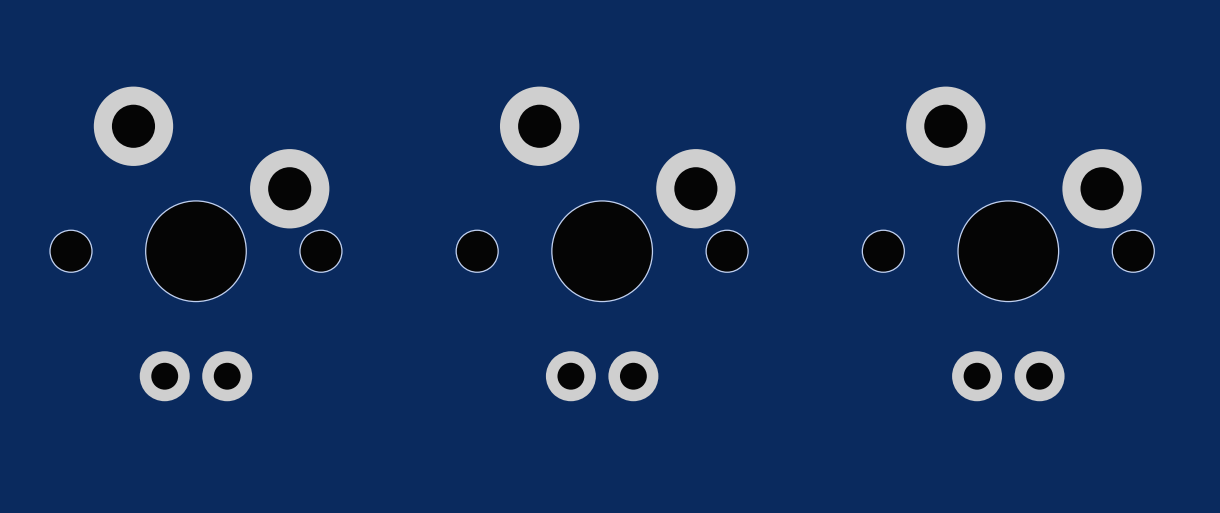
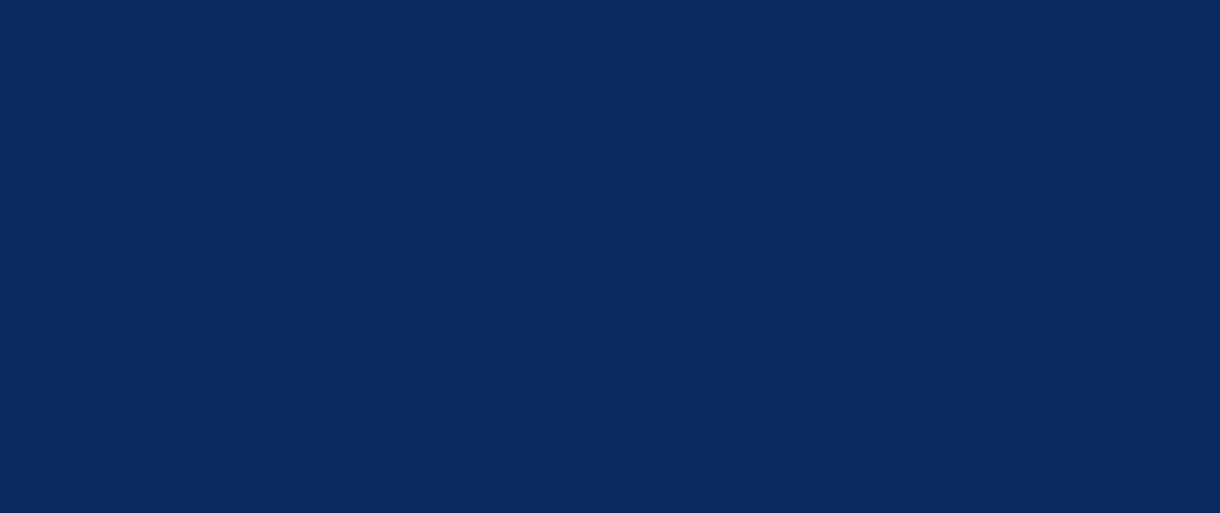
part: (195, 243) -> none
part: (602, 243) -> none
part: (1008, 243) -> none

